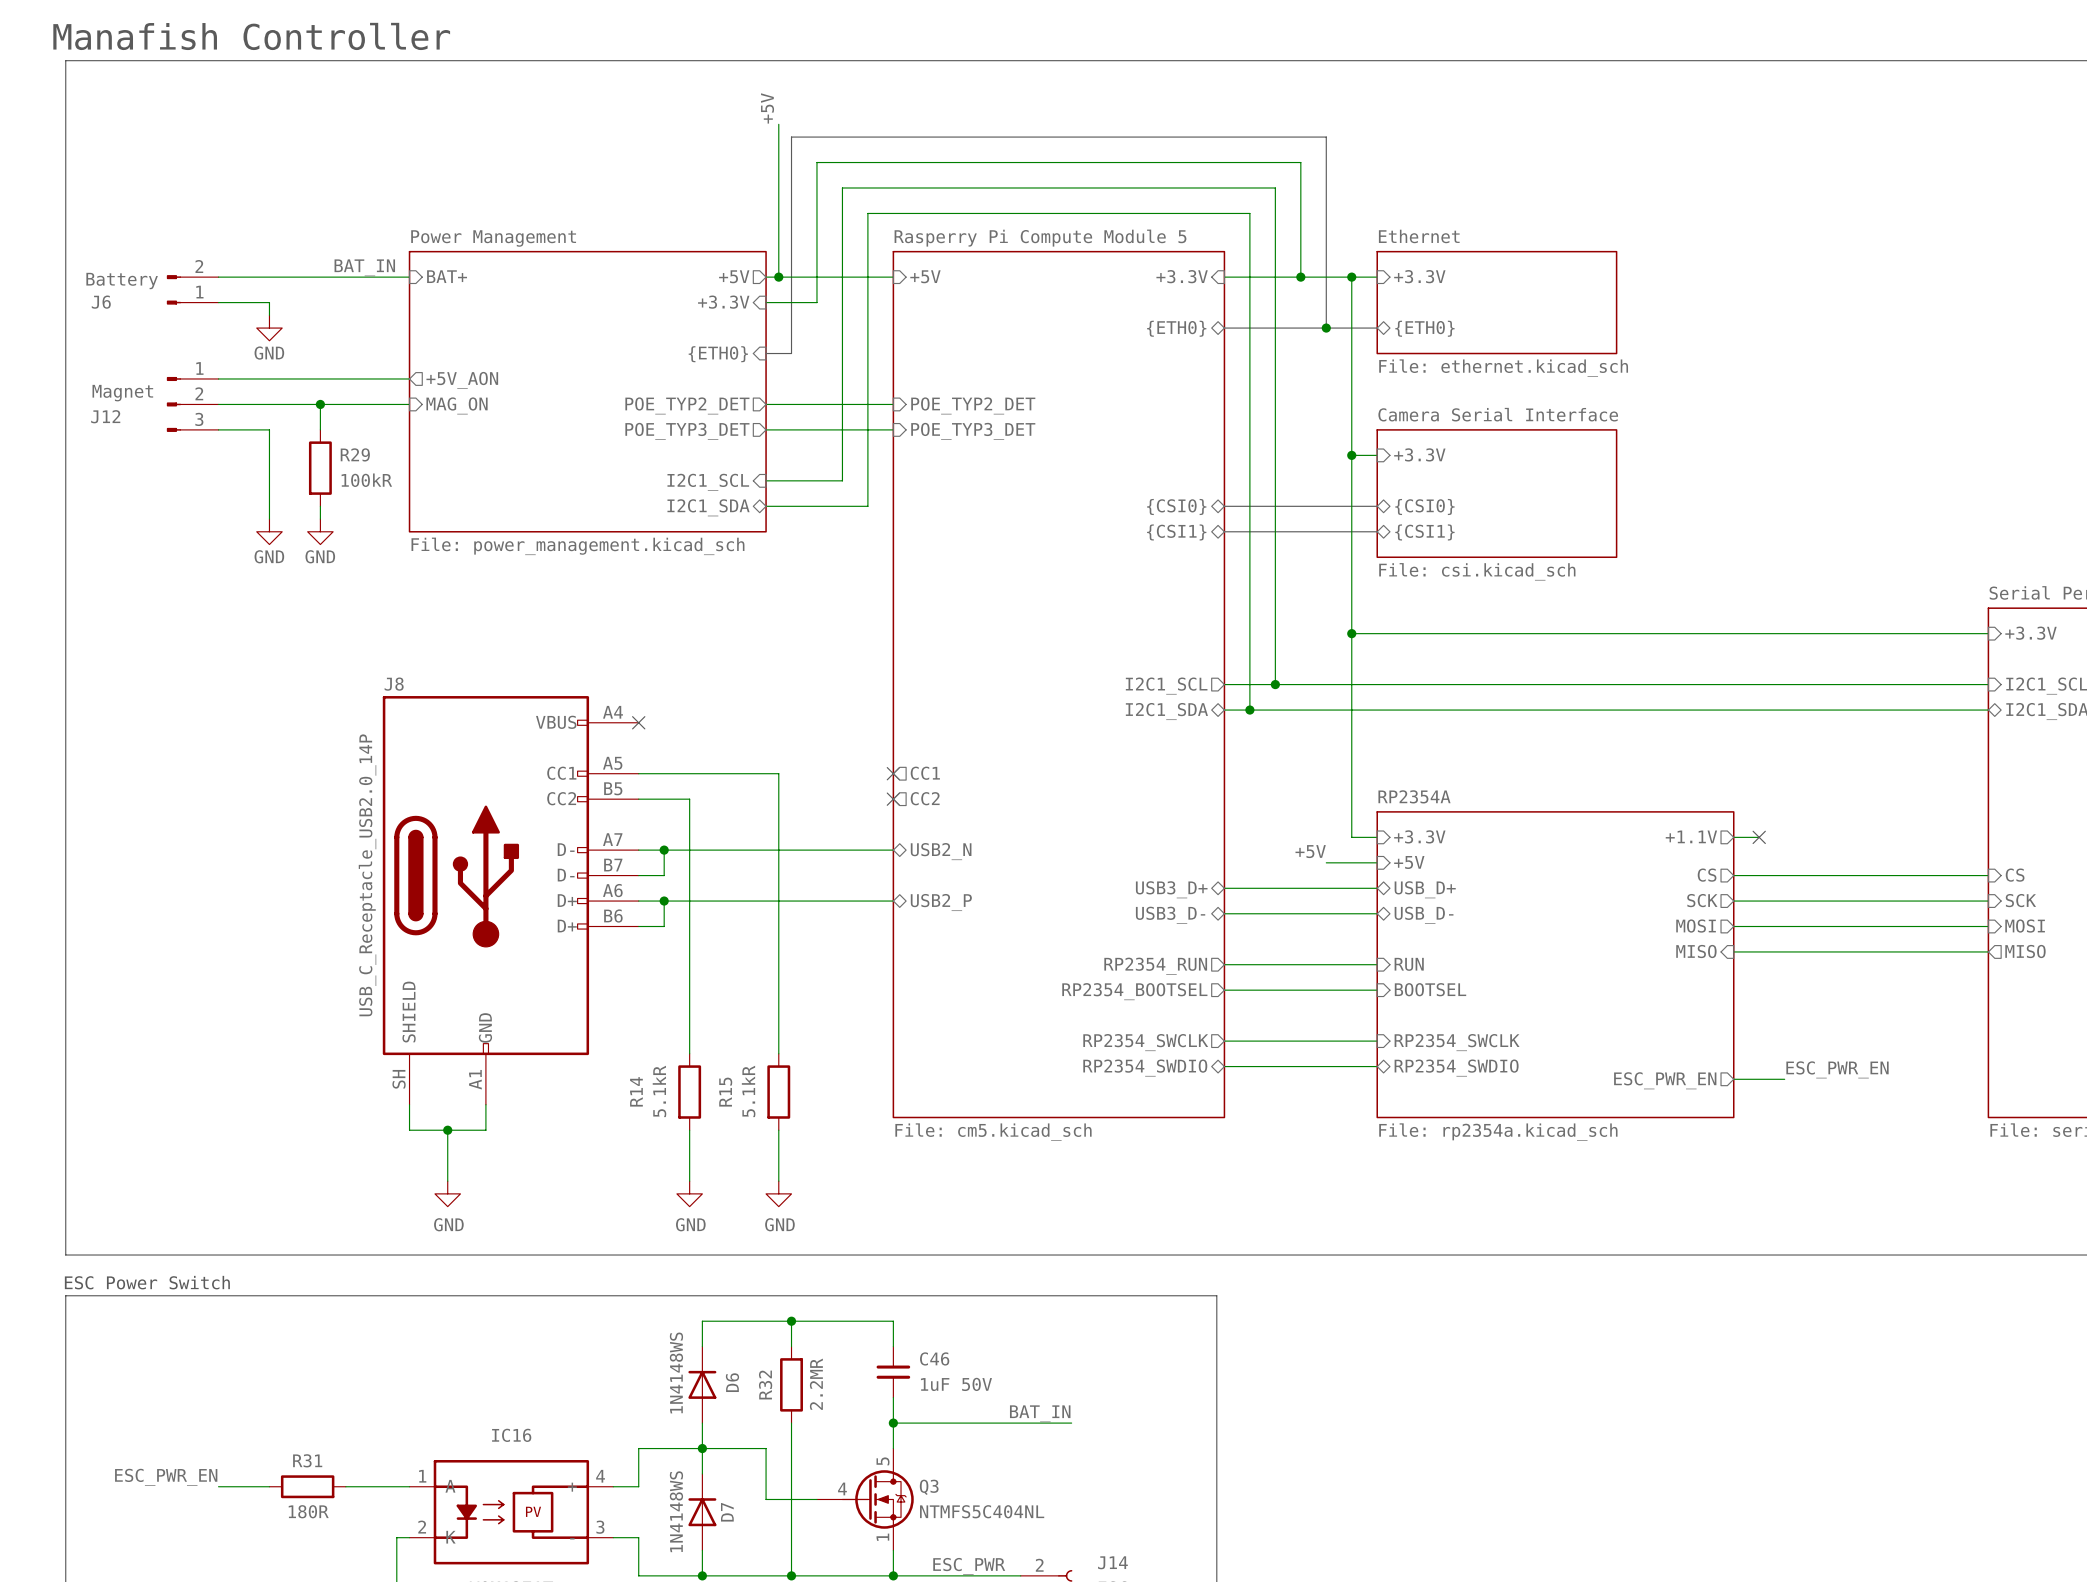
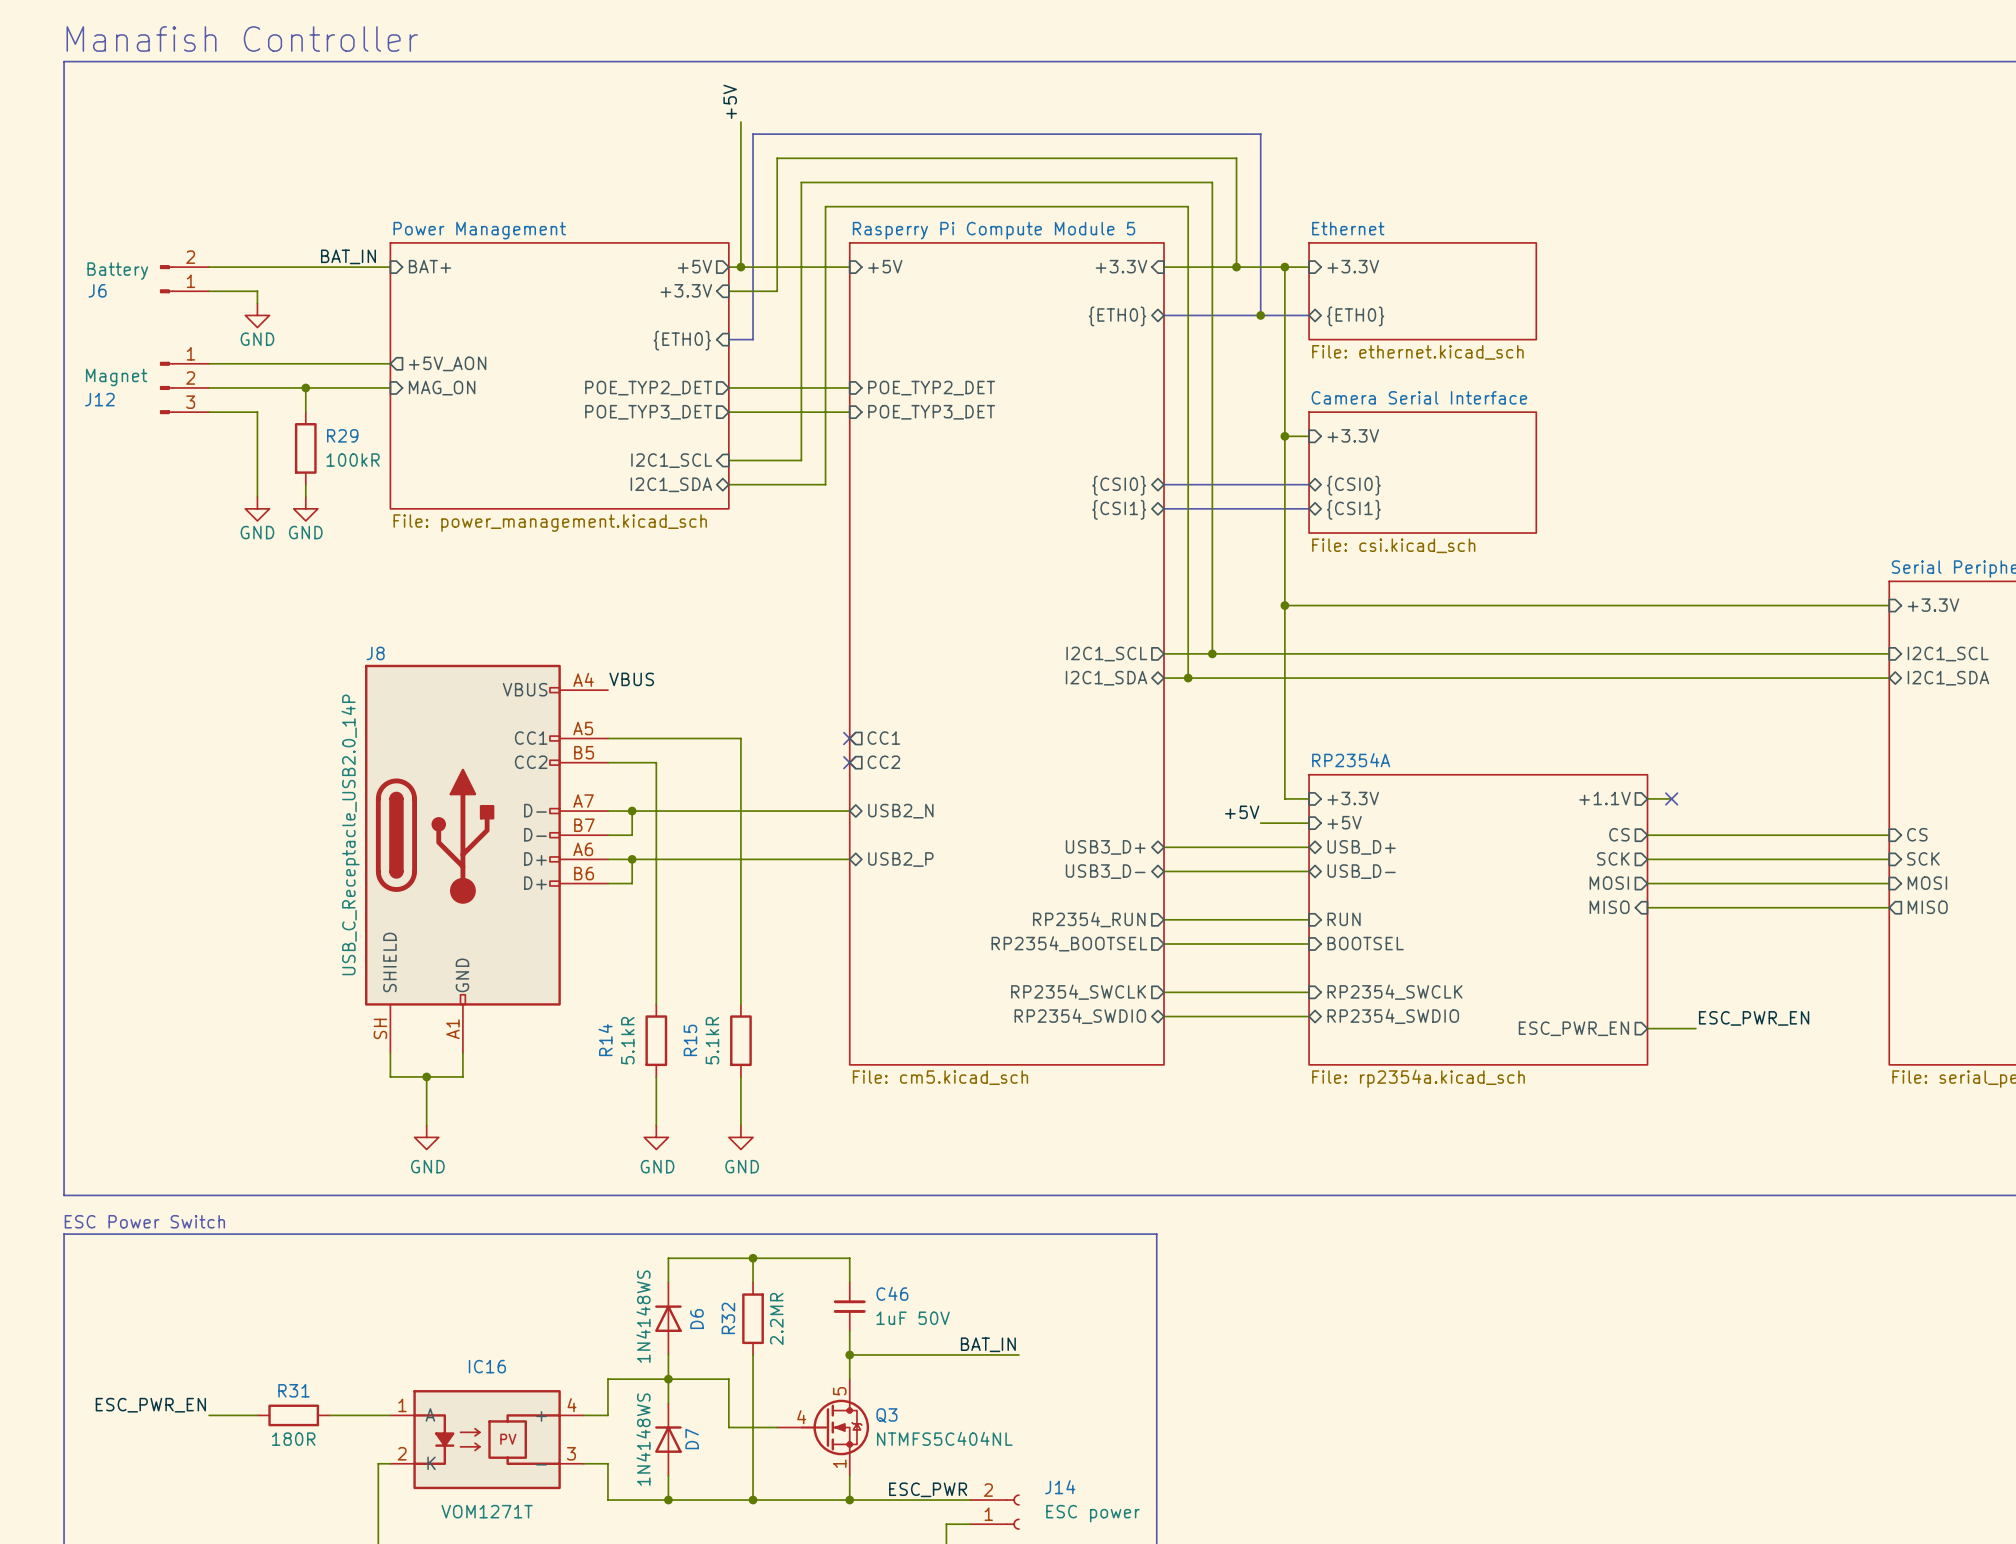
label: none -> VBUS (631, 679)
no-connect mark: (638, 722) -> none

